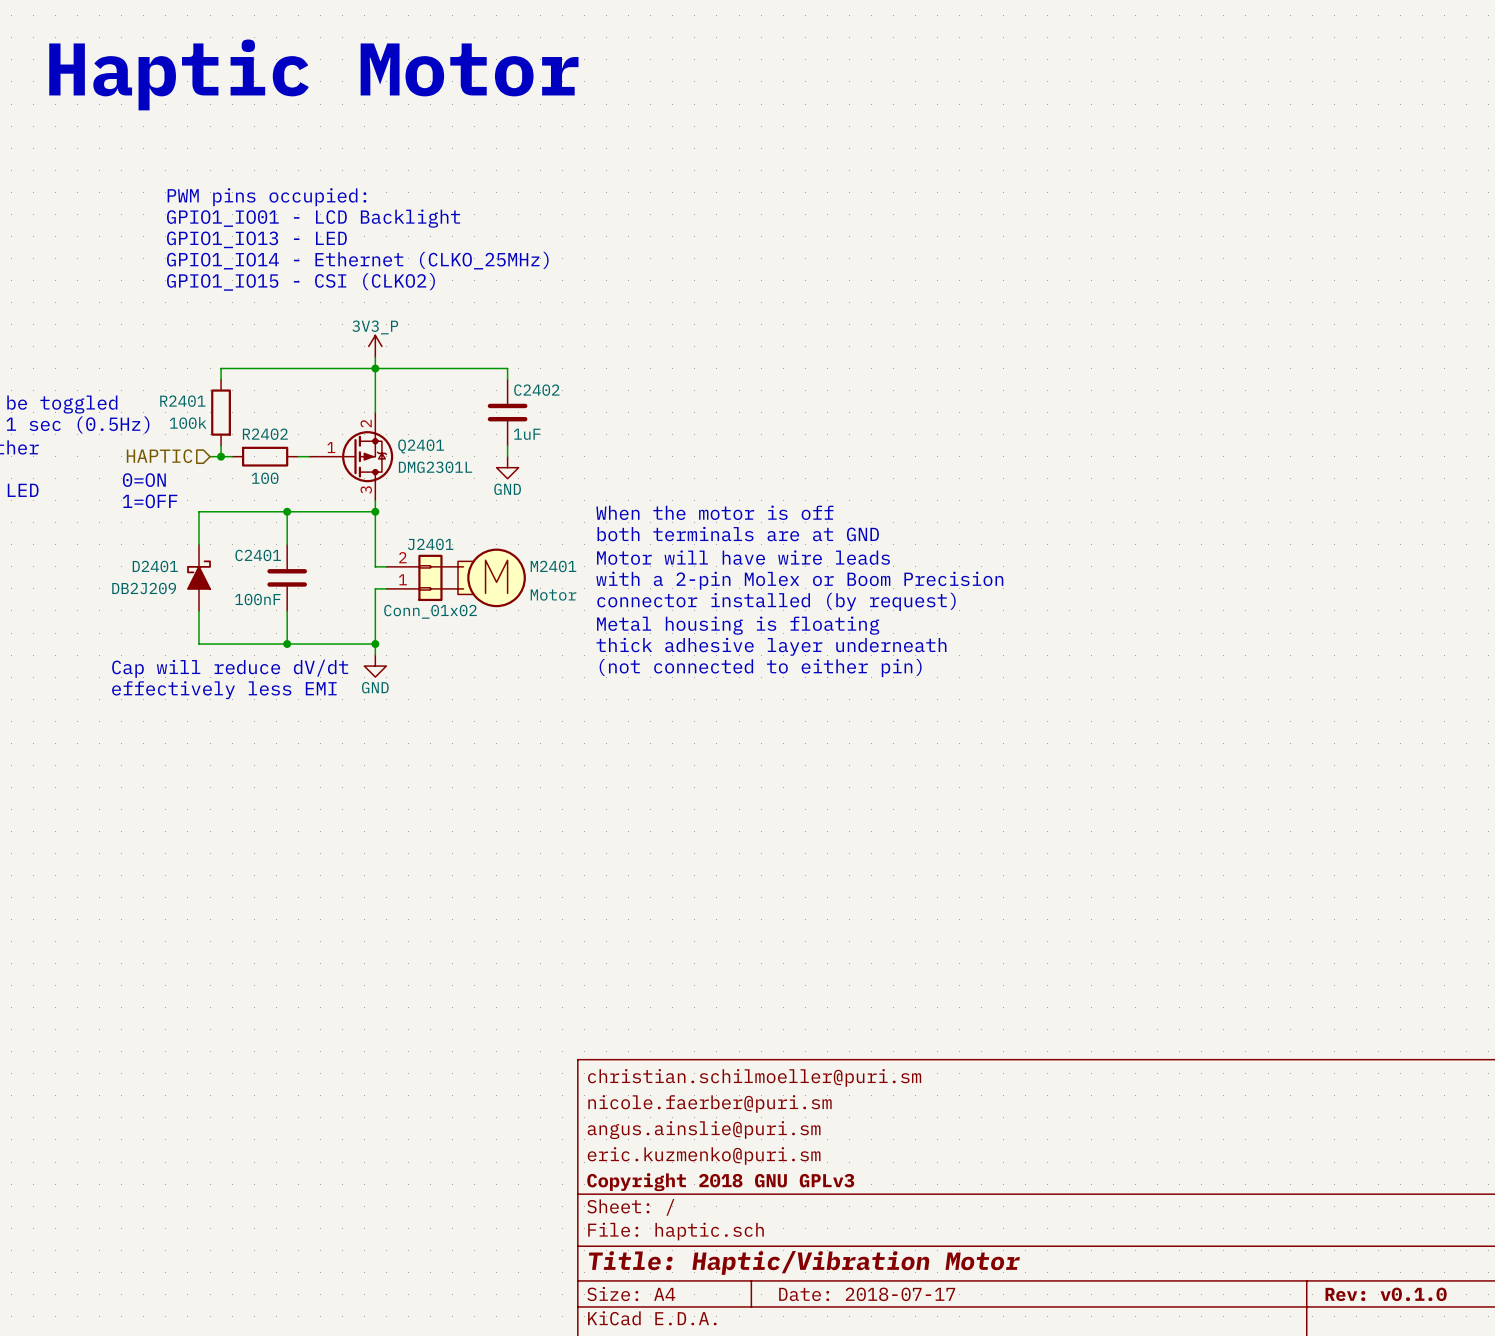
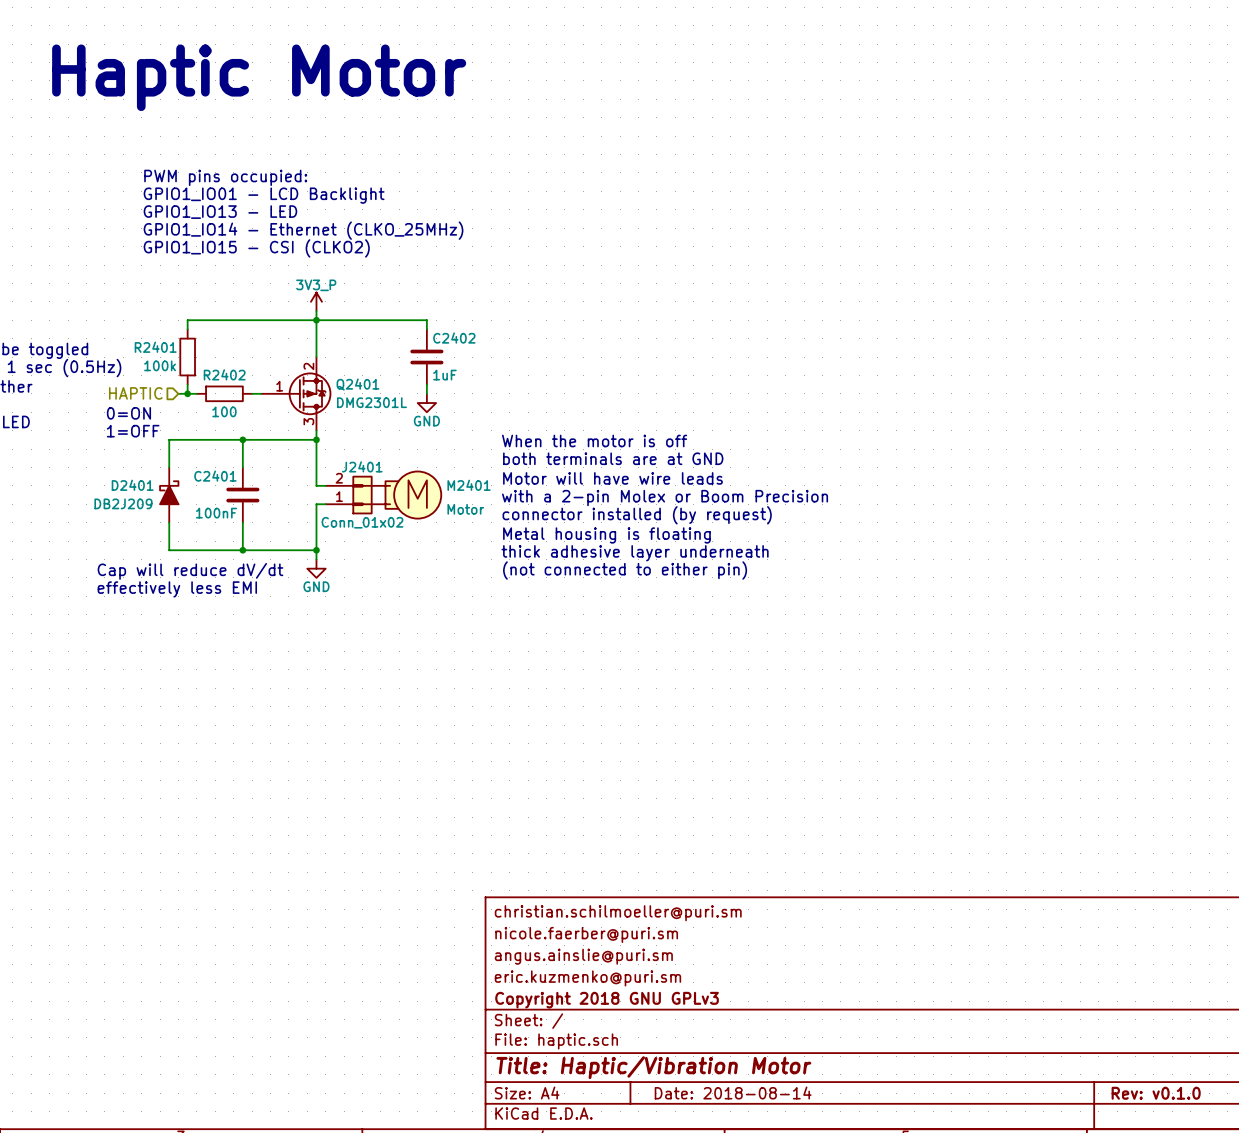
title block: Date: 2018-07-17 (867, 1294) -> Date: 2018-08-14 (733, 1093)

